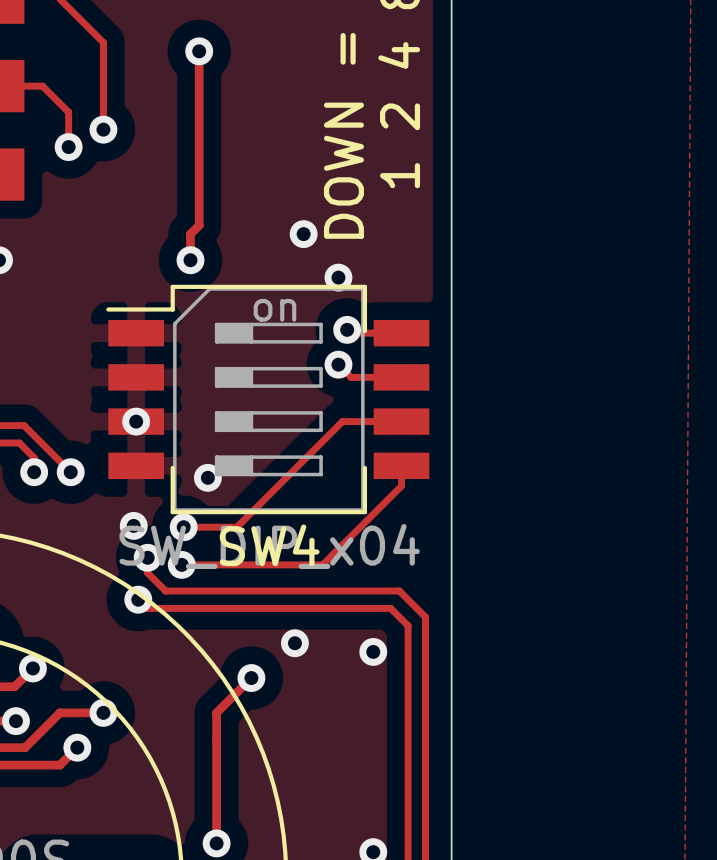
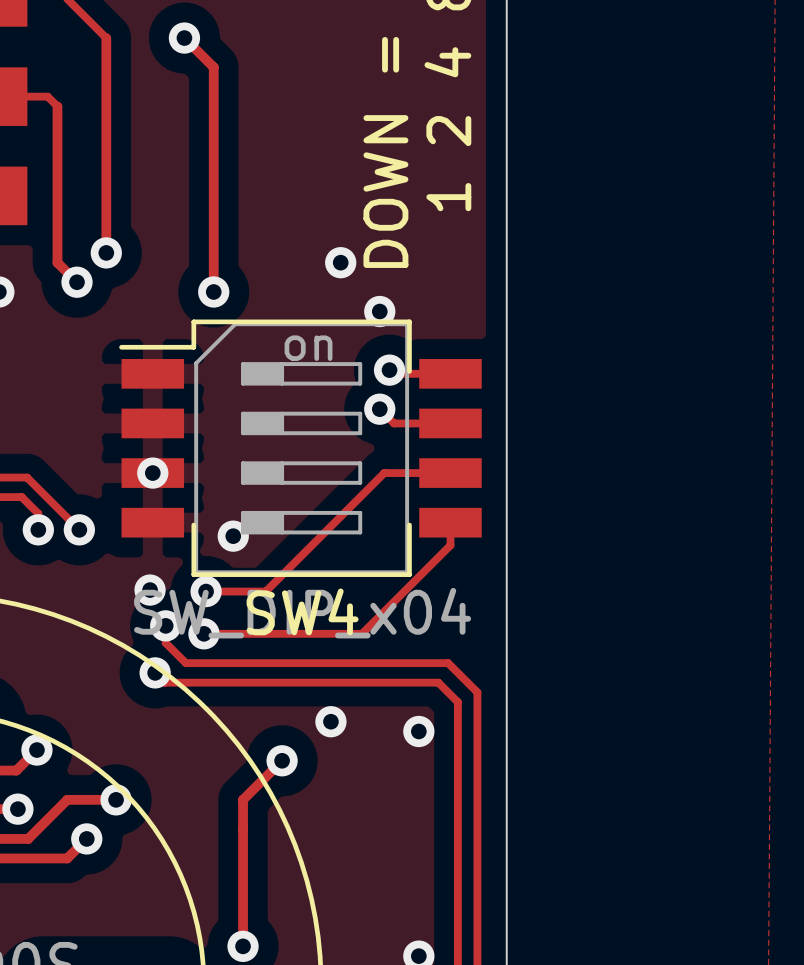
track: (94, 33) (103, 42) (103, 129) -> (106, 38) (106, 252)
track: (199, 51) (199, 225) (190, 234) -> (184, 38) (213, 67) (213, 262)
via position: (199, 51) -> (184, 38)
track: (51, 94) (68, 112) (68, 147) -> (57, 106) (57, 262) (77, 282)
via: (103, 129) -> none
via: (68, 147) -> none
via: none -> (106, 252)
via: none -> (77, 282)

